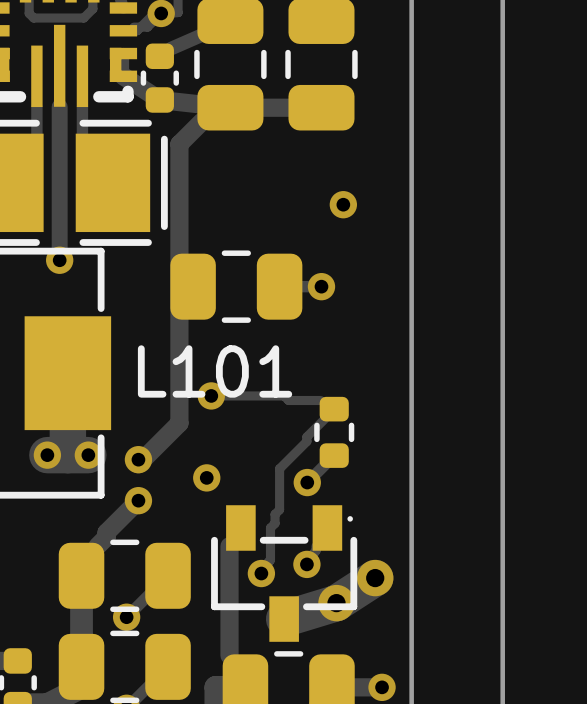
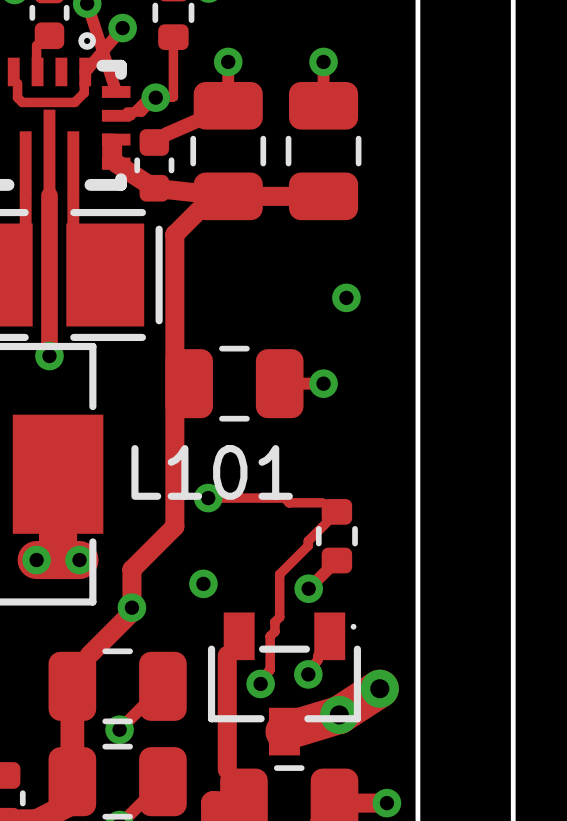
via: (138, 459) -> none
track: (138, 500) (106, 532) (106, 537) -> (131, 569) (131, 612) (98, 645)

